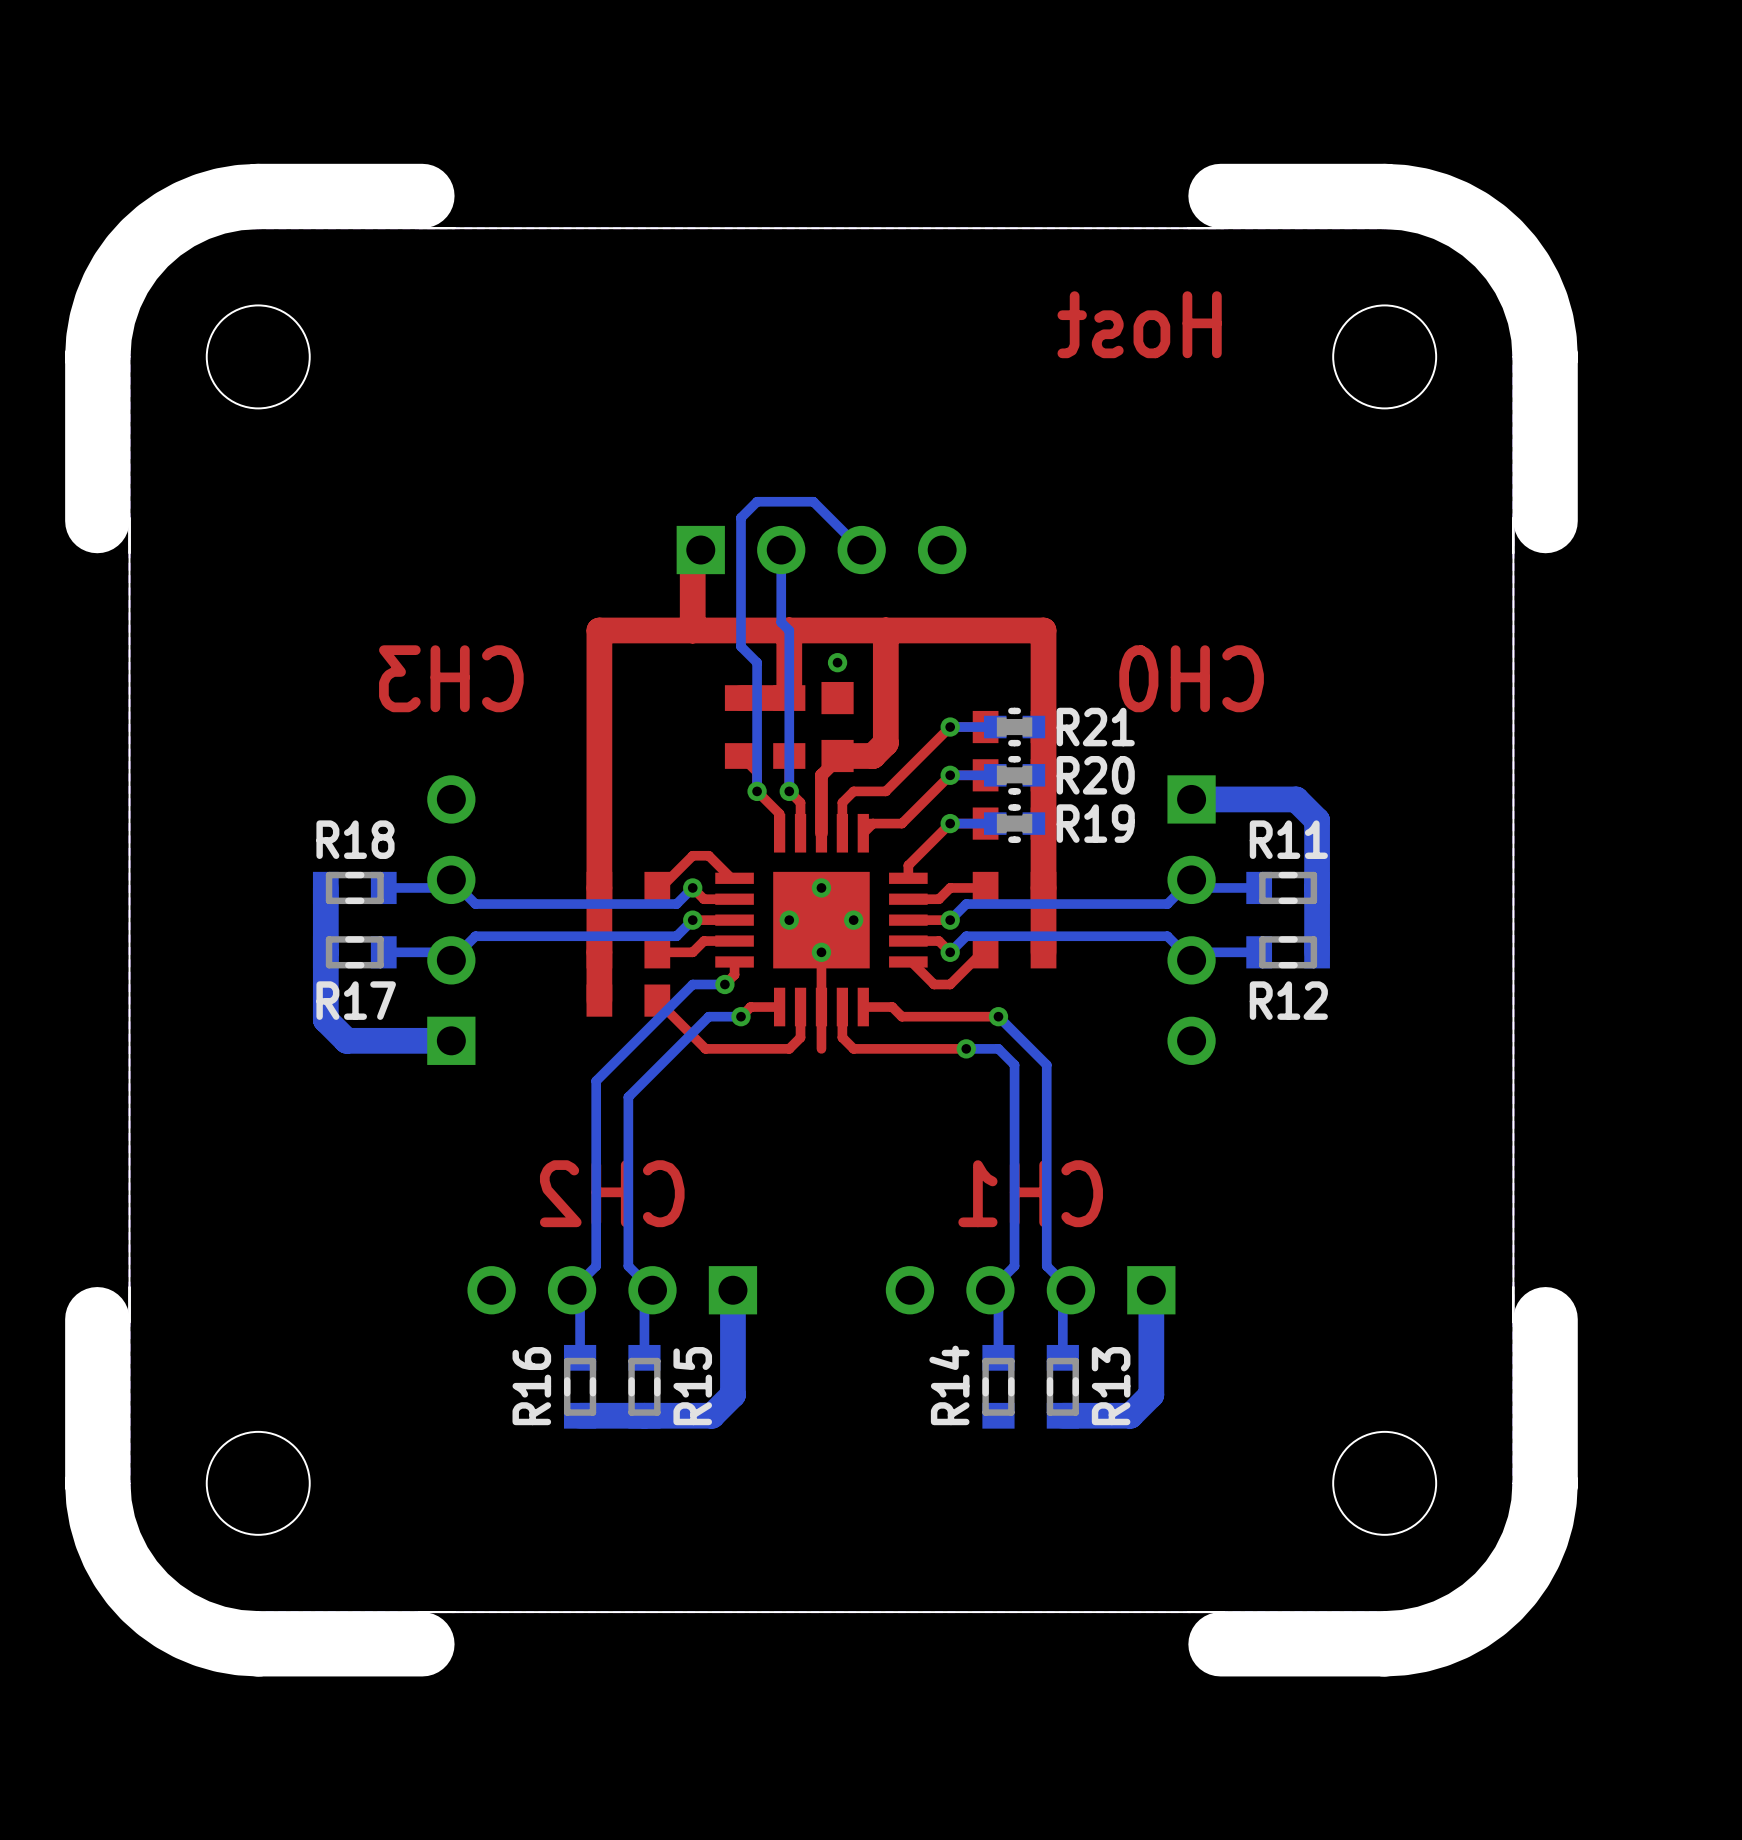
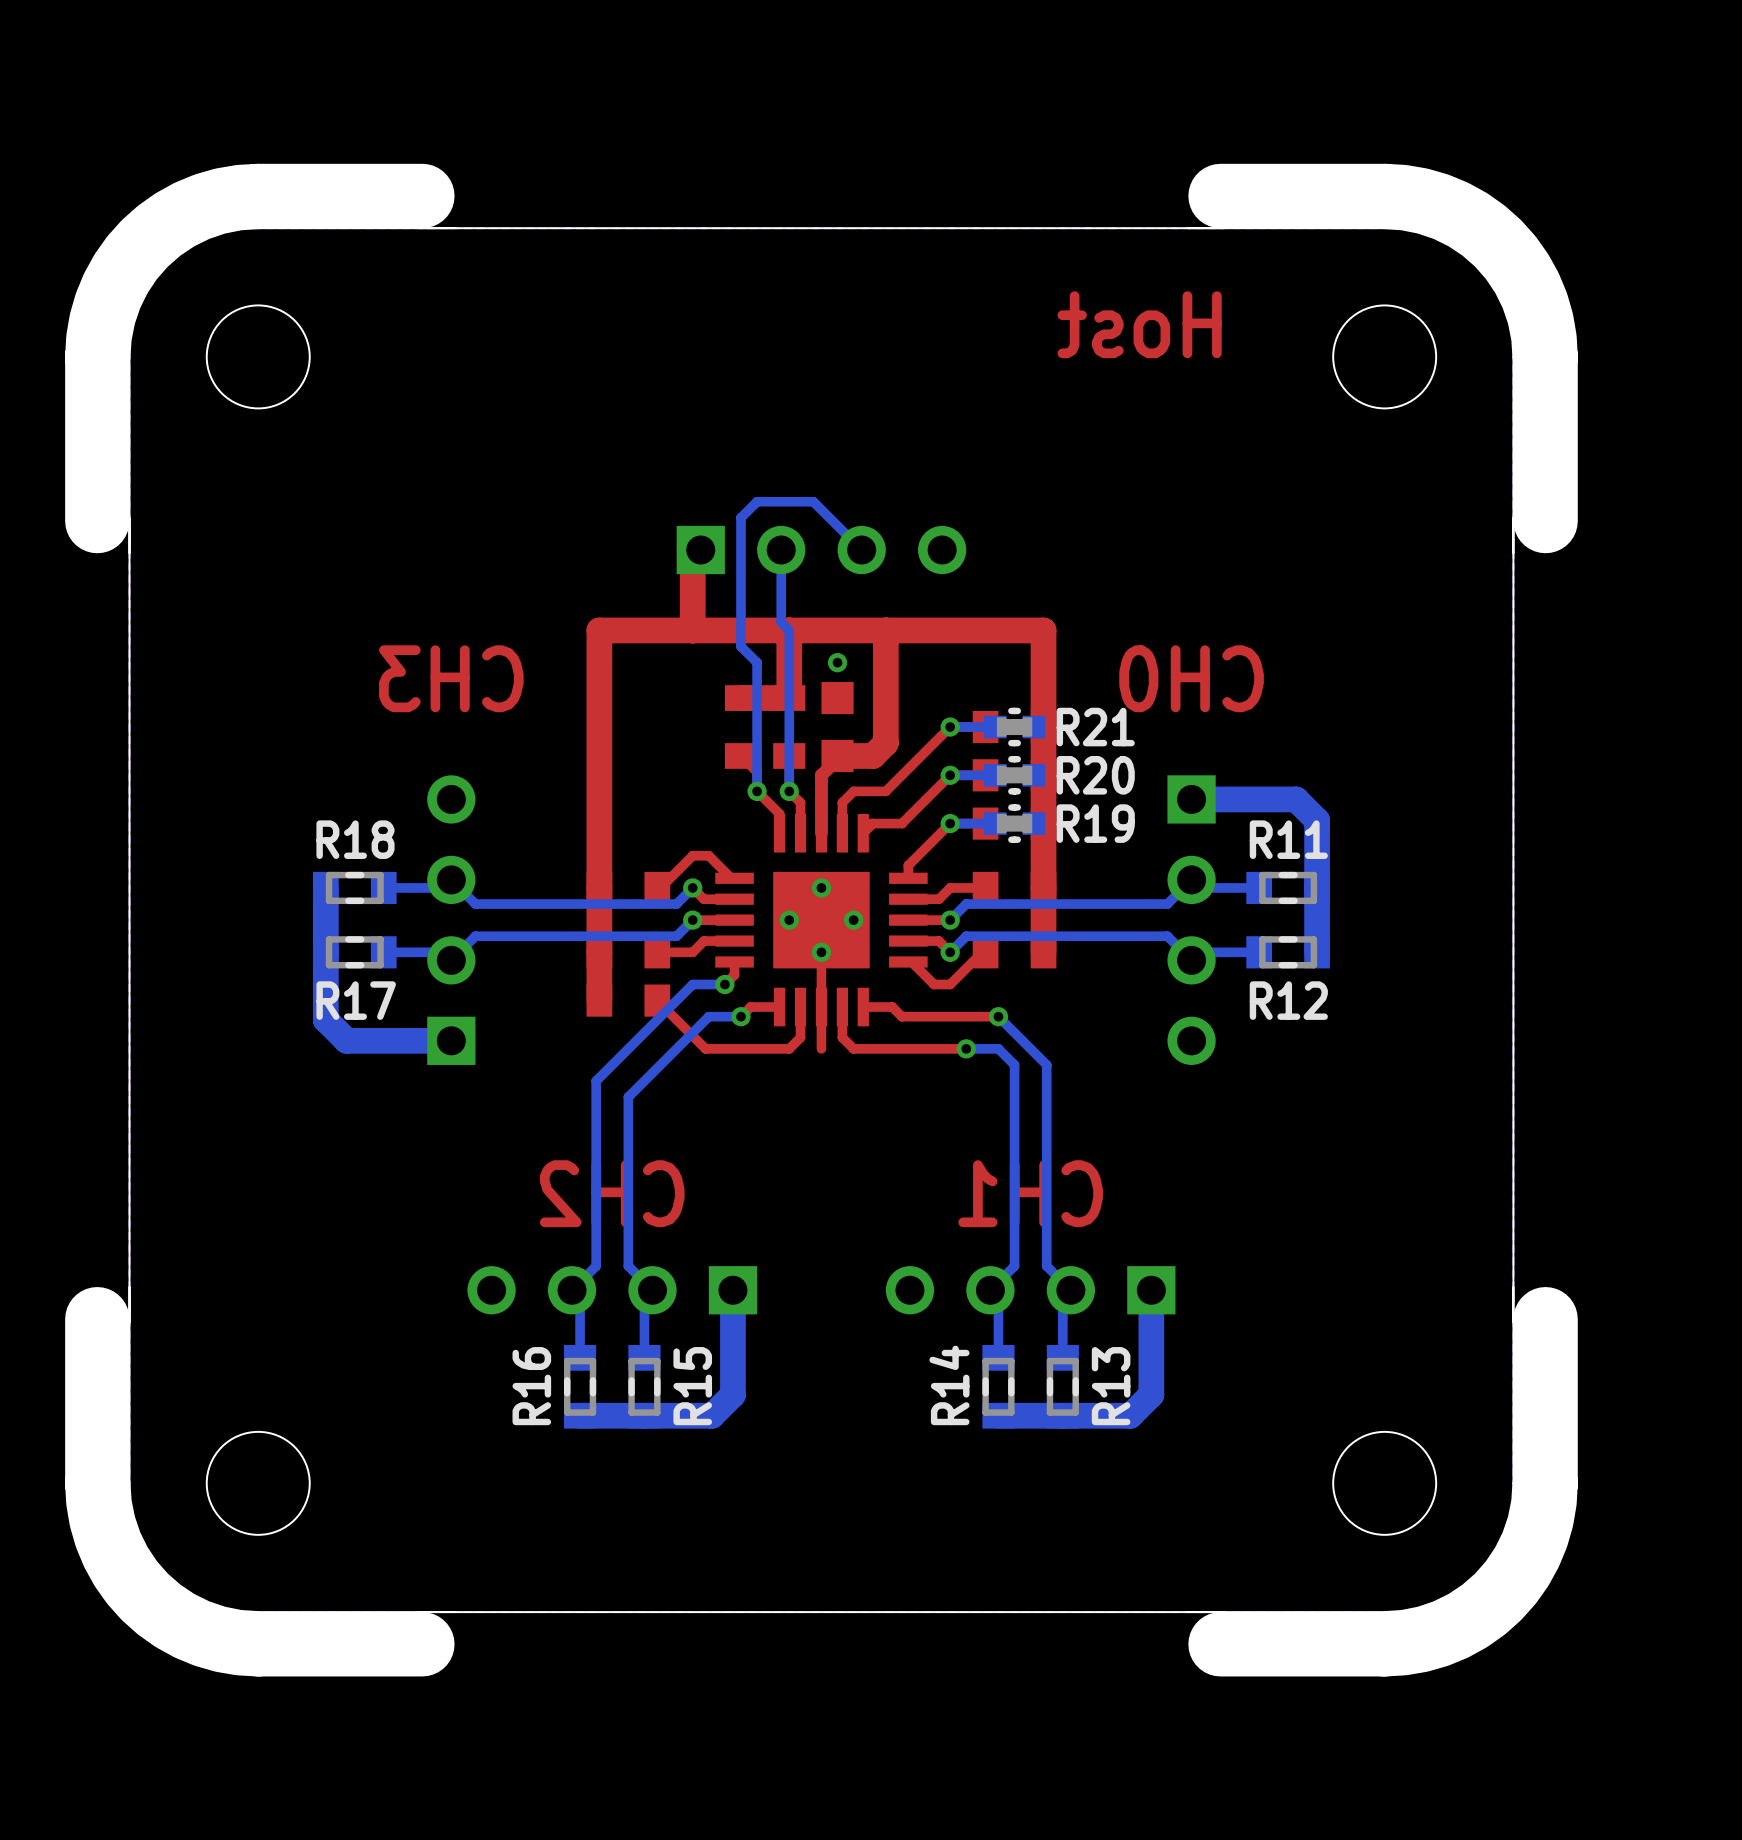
bottom track: none -> (1062, 1415) (998, 1415)

